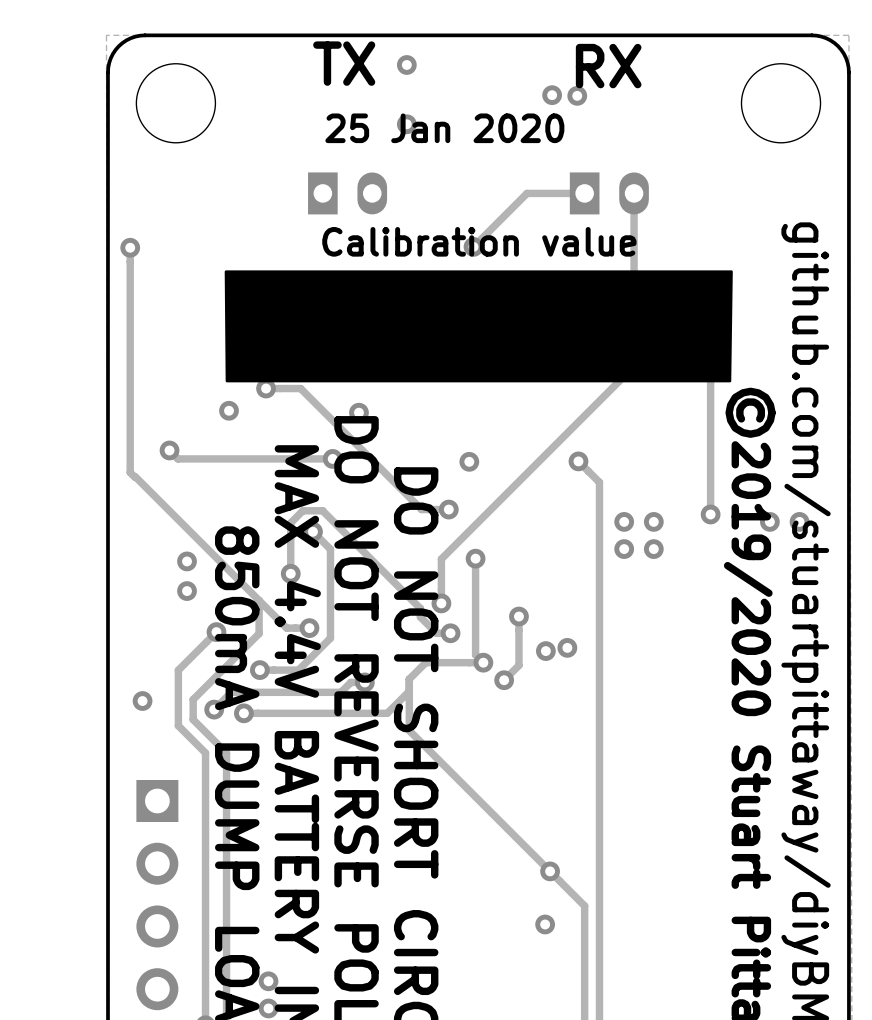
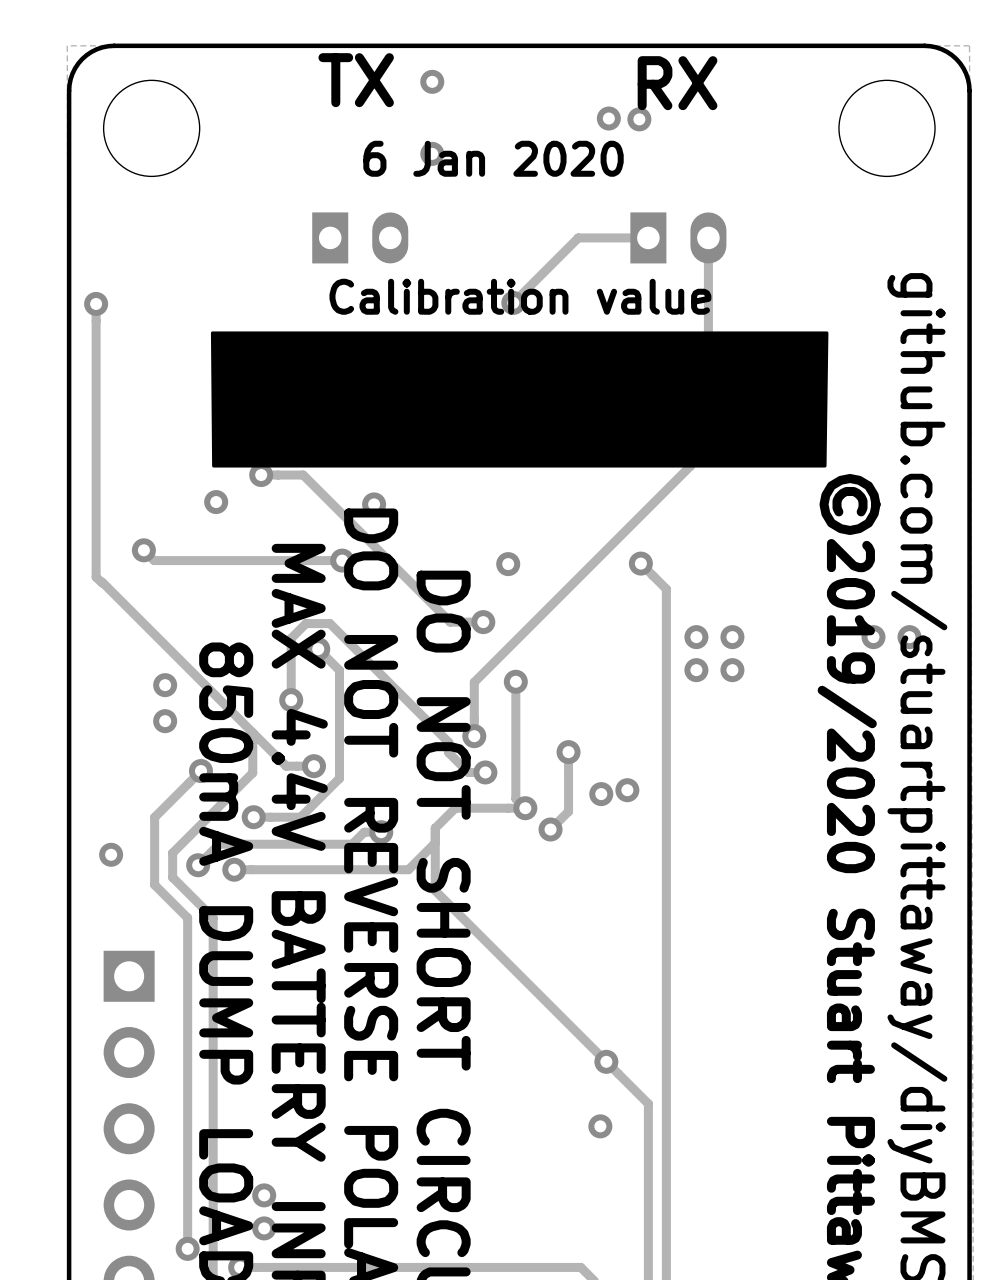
text: 25 Jan 2020 (444, 128) -> 6 Jan 2020 (493, 158)
track: (684, 286) (710, 311) (710, 514) -> none
via: (710, 514) -> none

